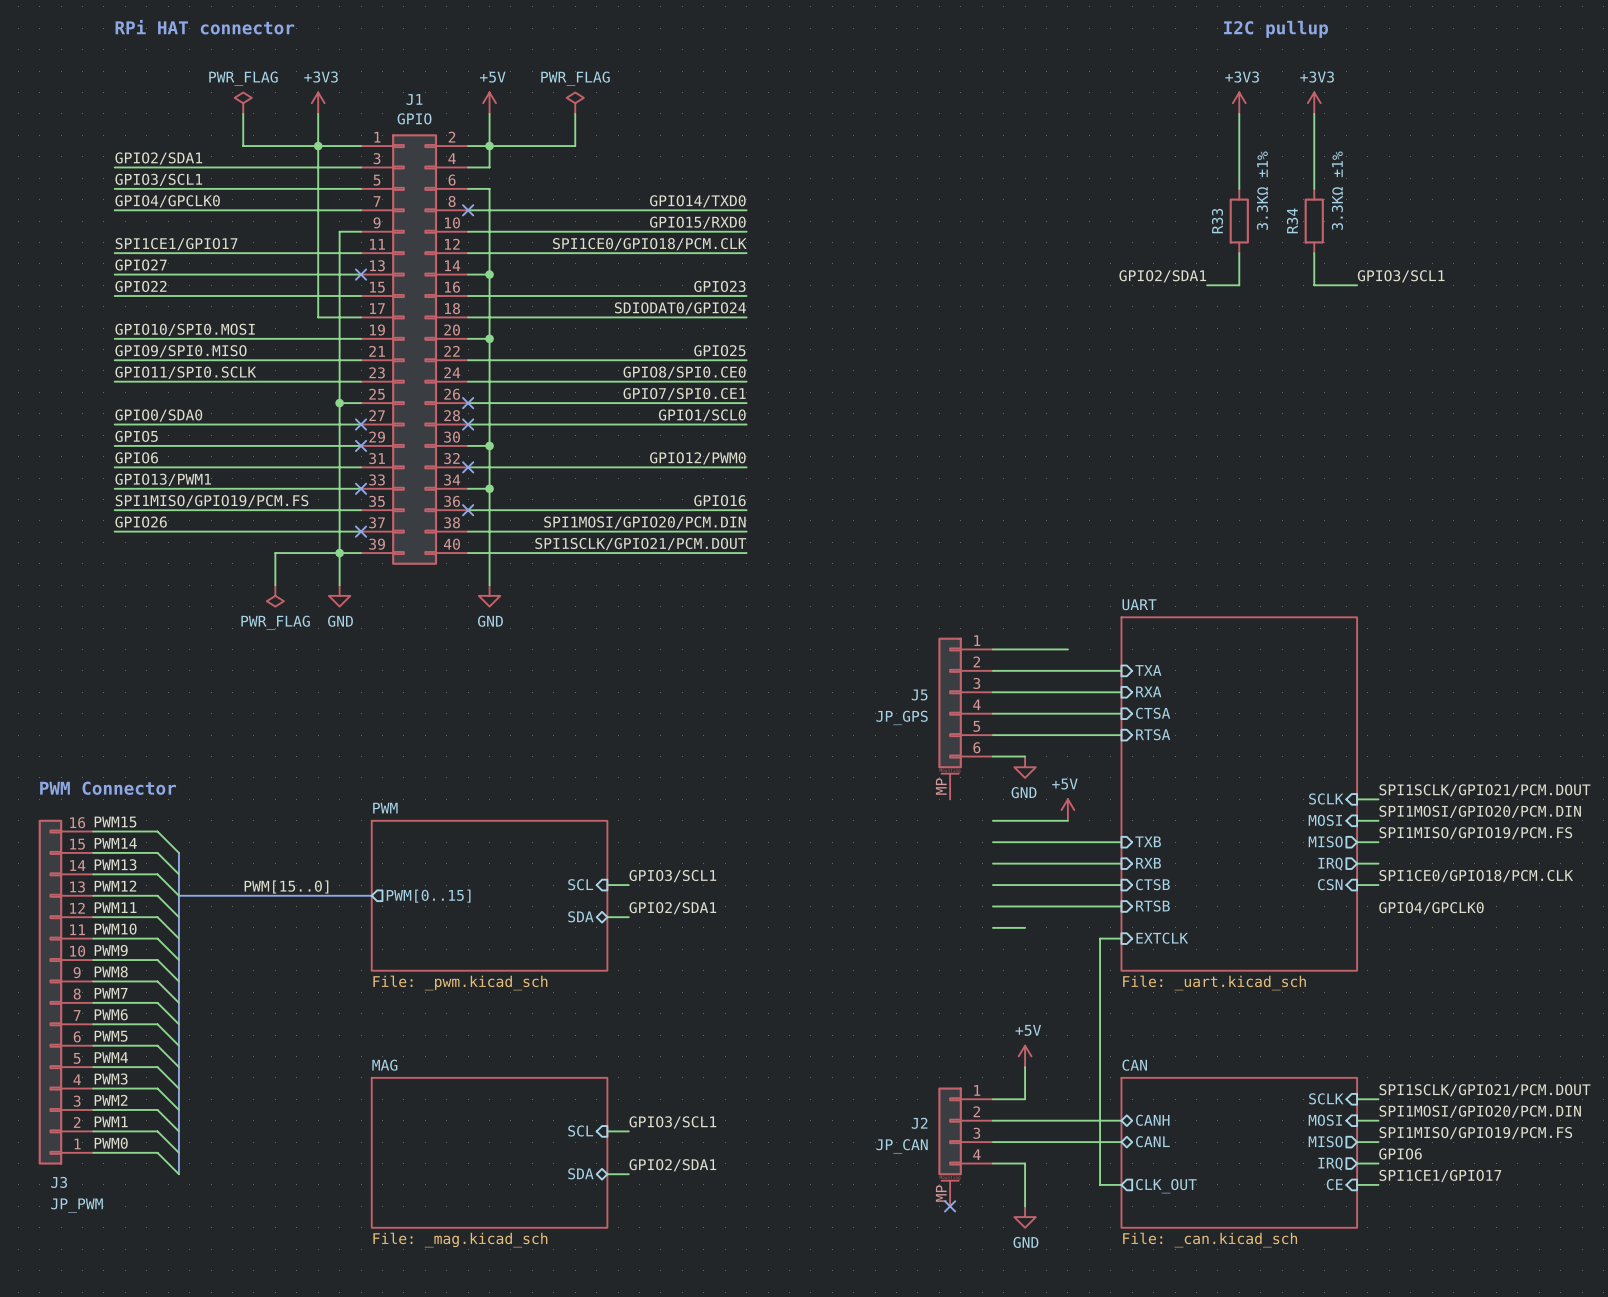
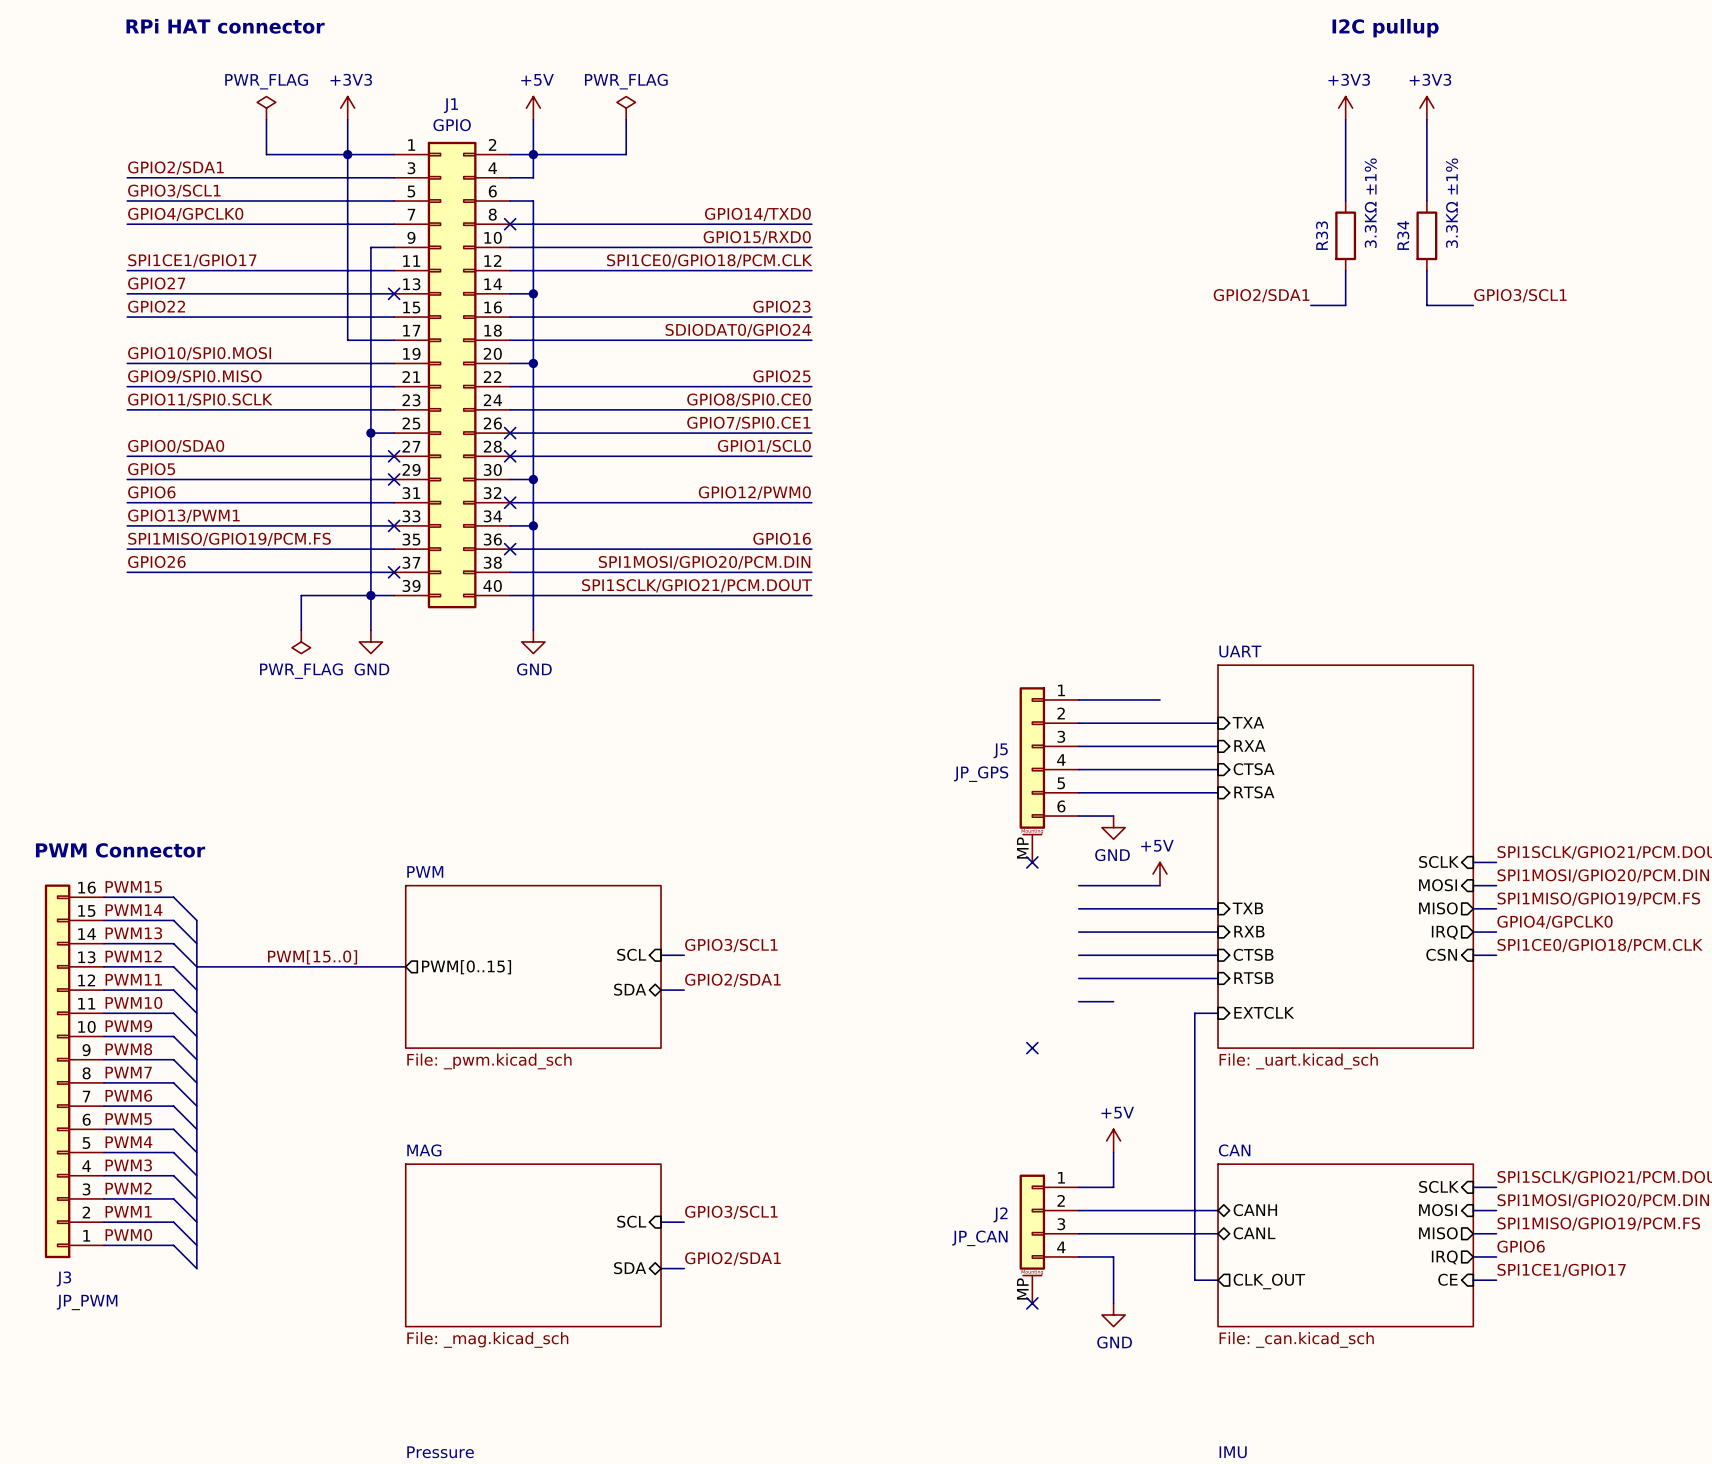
no-connect mark: none -> (1032, 862)
label position: GPIO4/GPCLK0 (1431, 908) -> GPIO4/GPCLK0 (1554, 922)
no-connect mark: none -> (1032, 1048)

